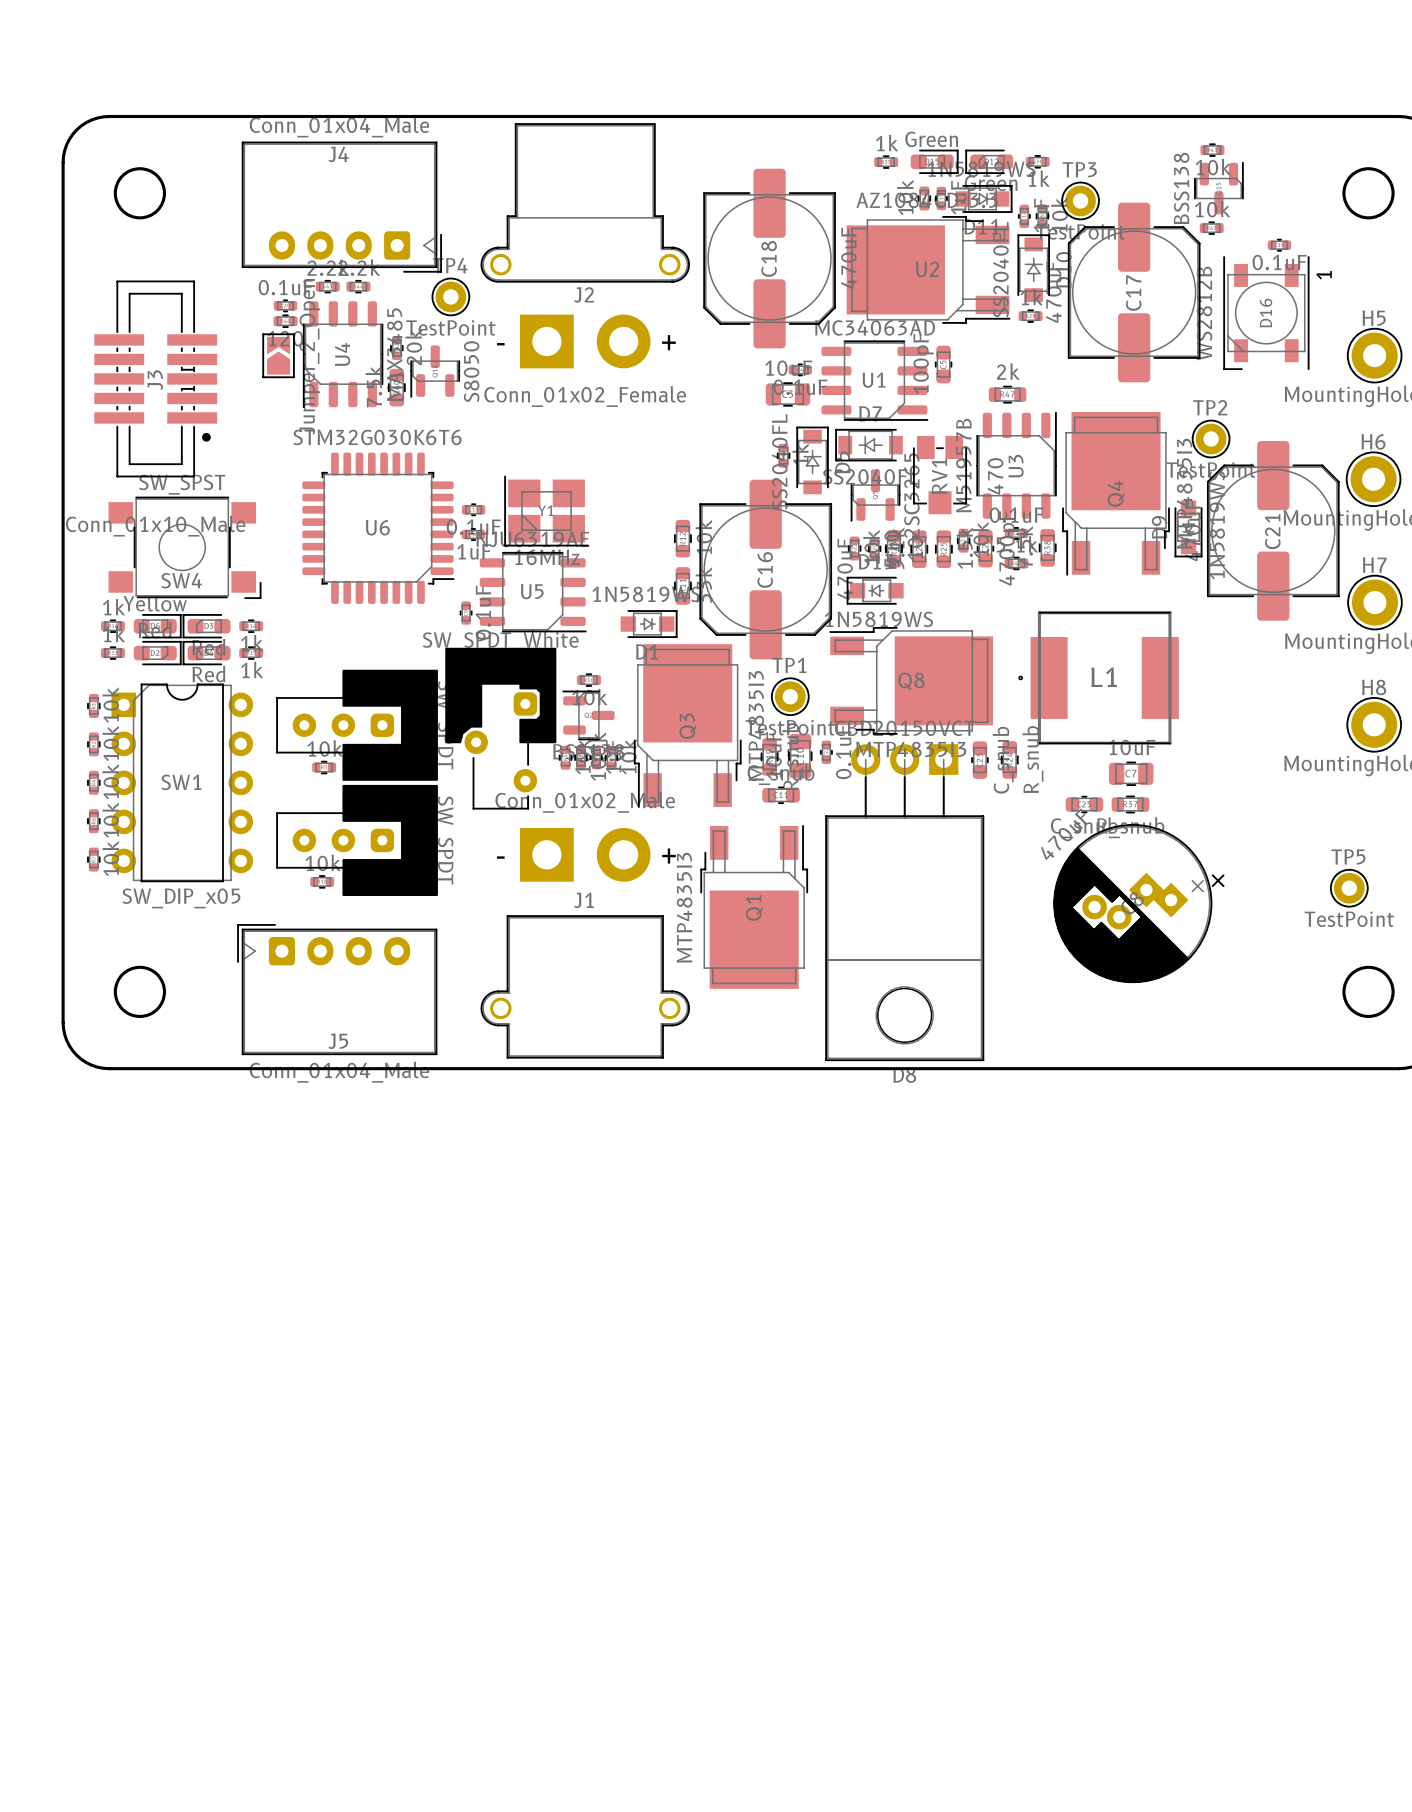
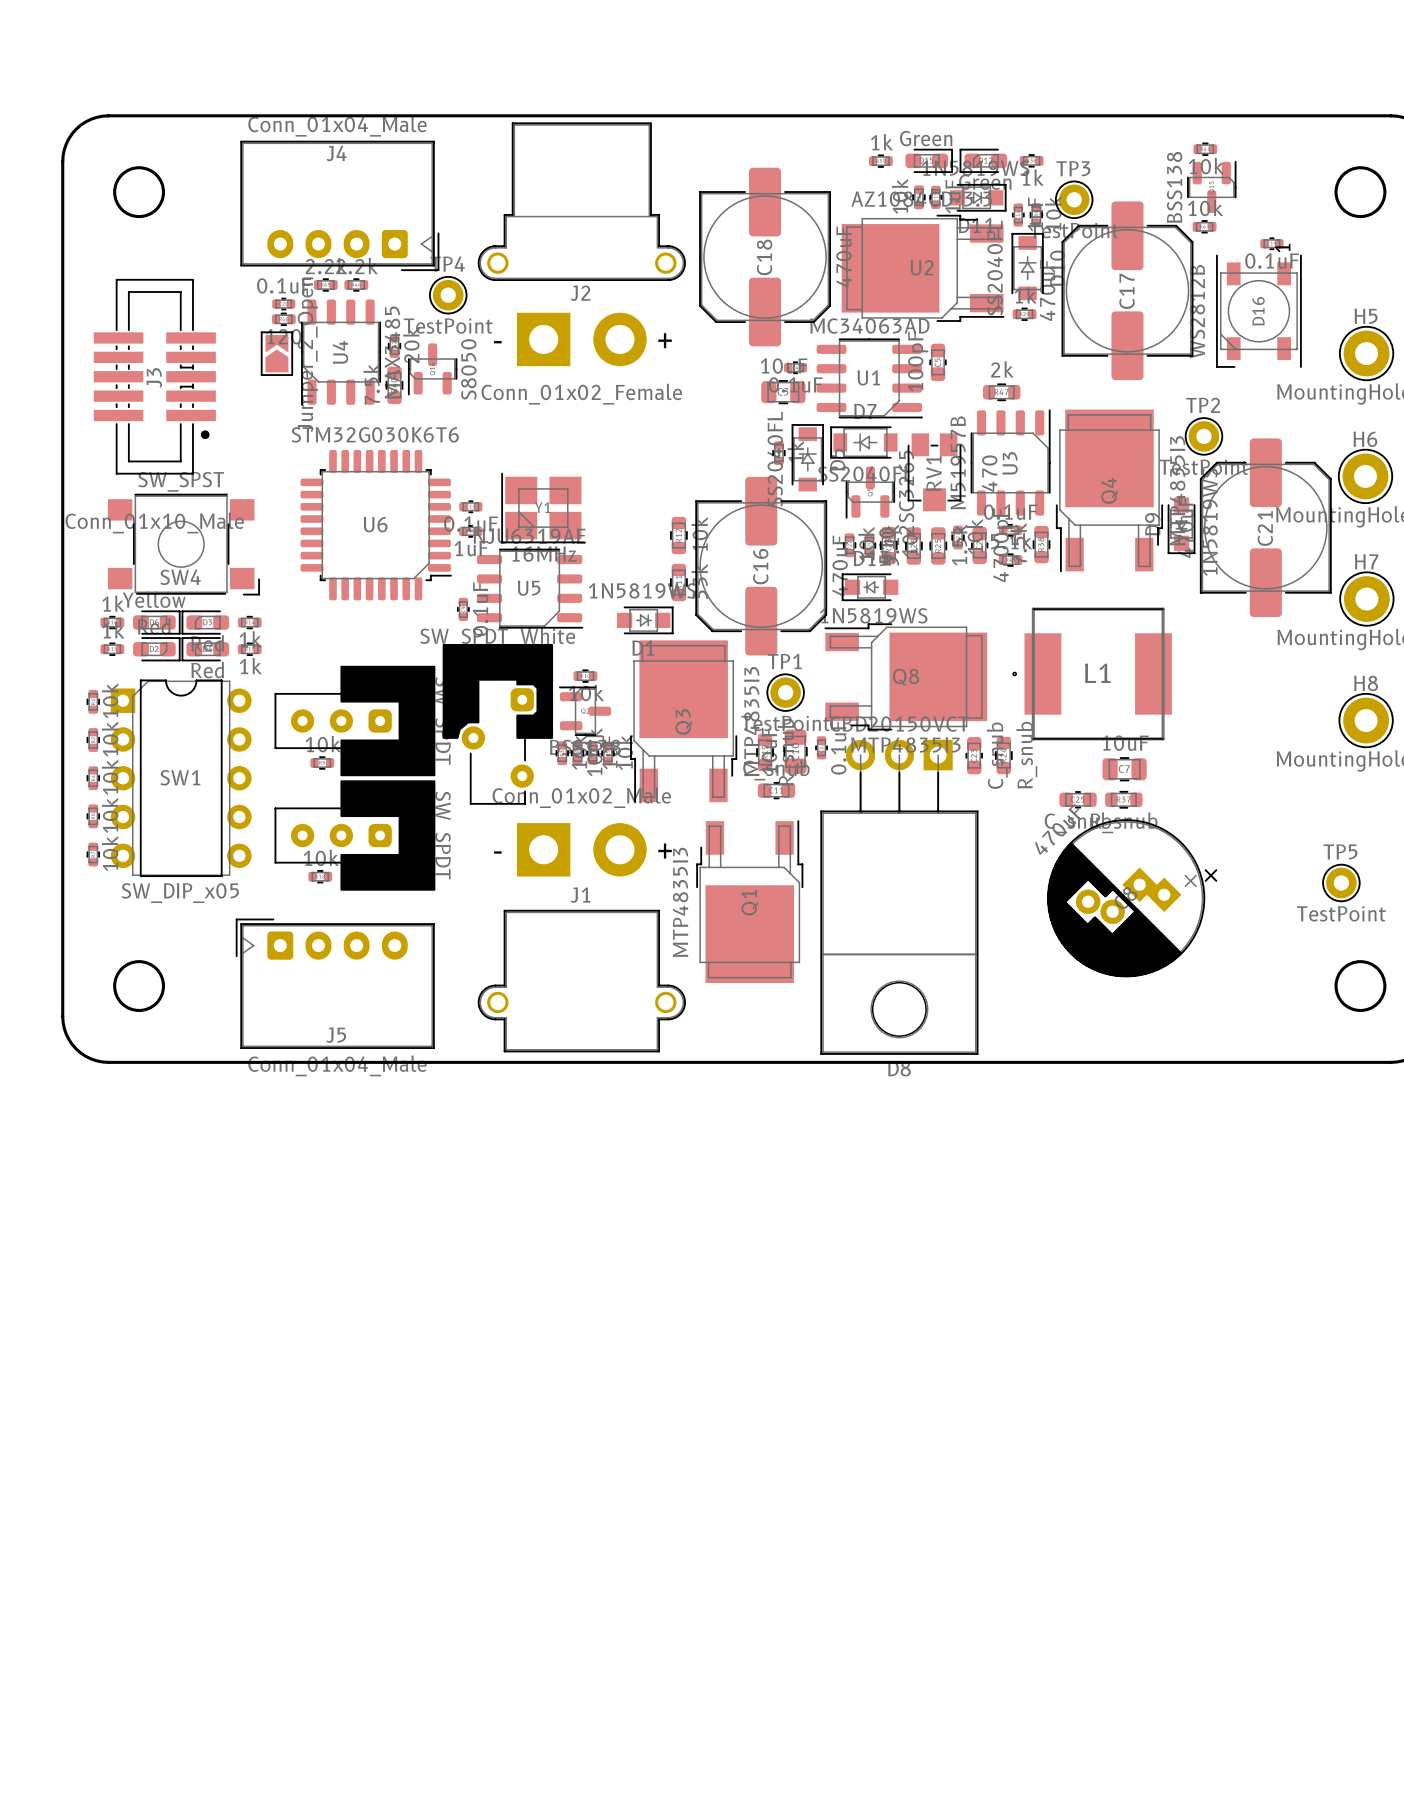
D16 text position: 1 (1324, 275) -> 1 (1282, 248)

